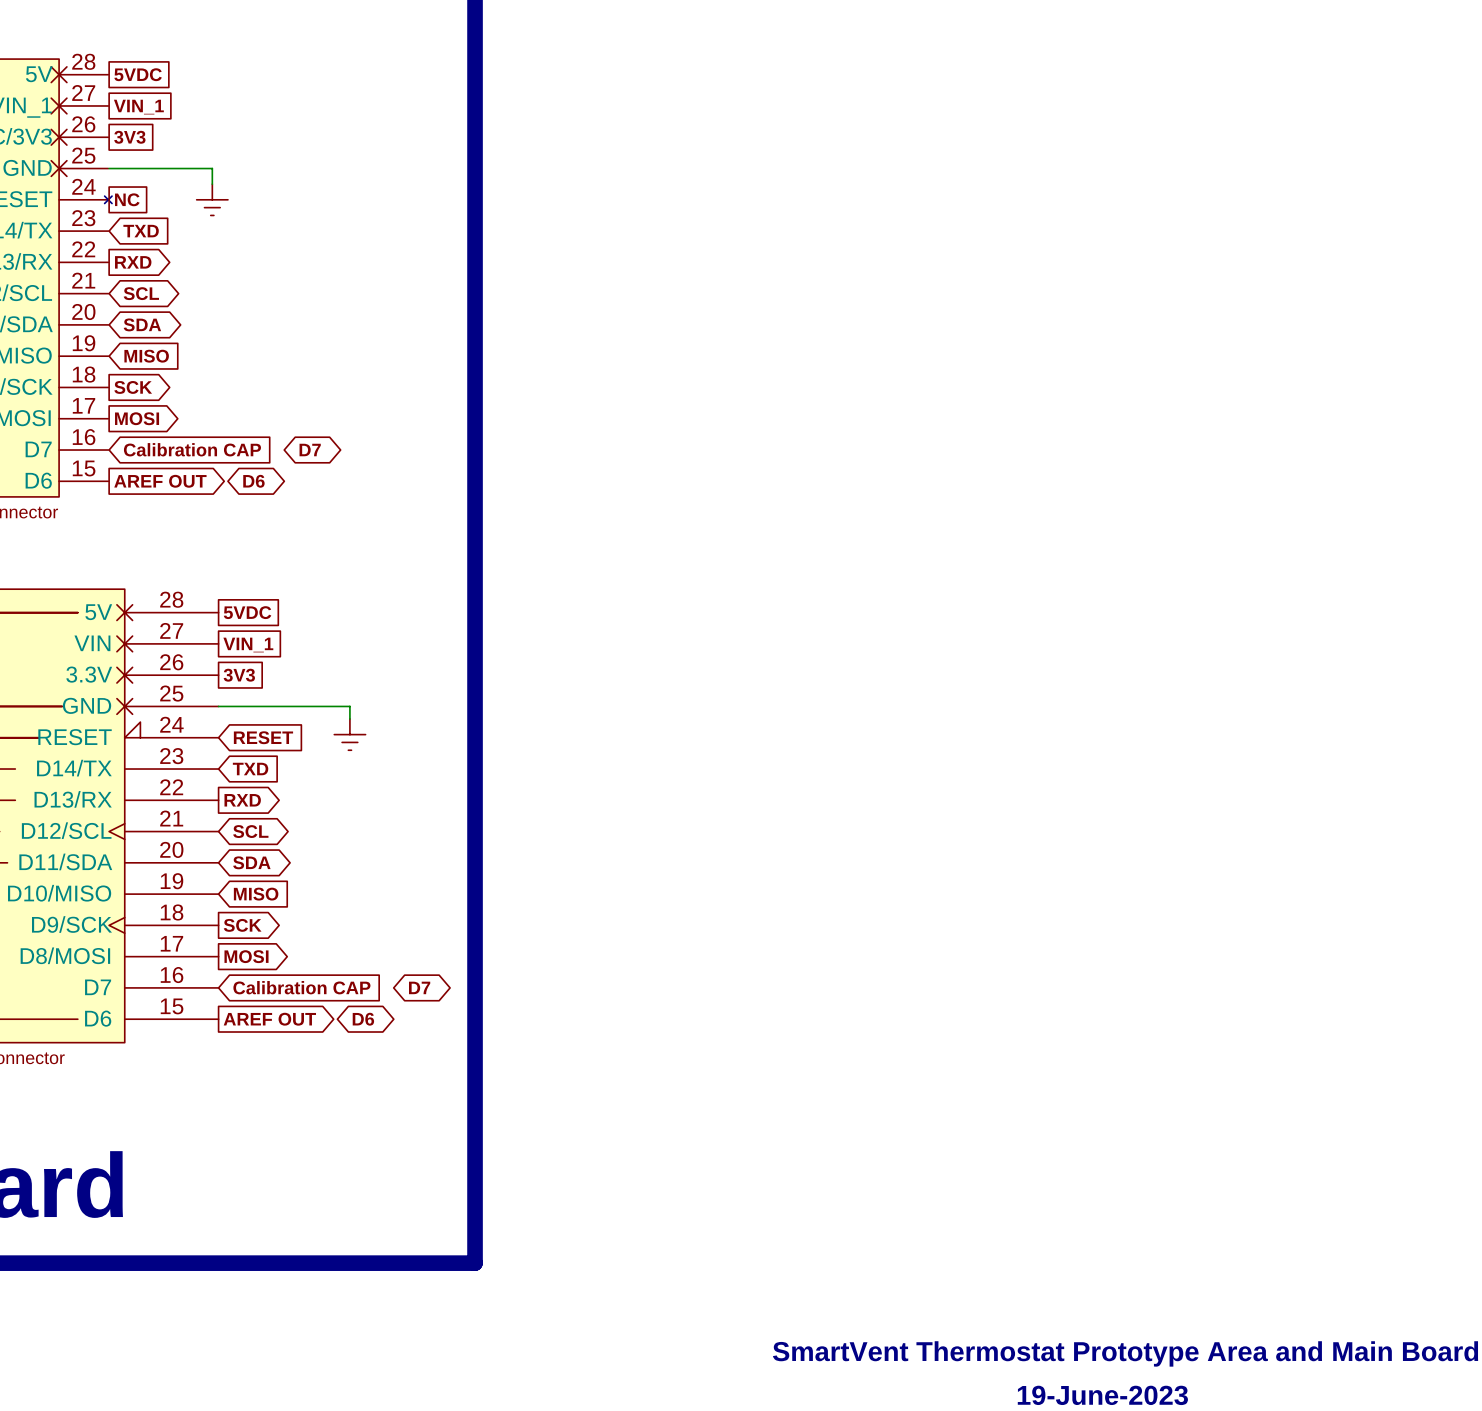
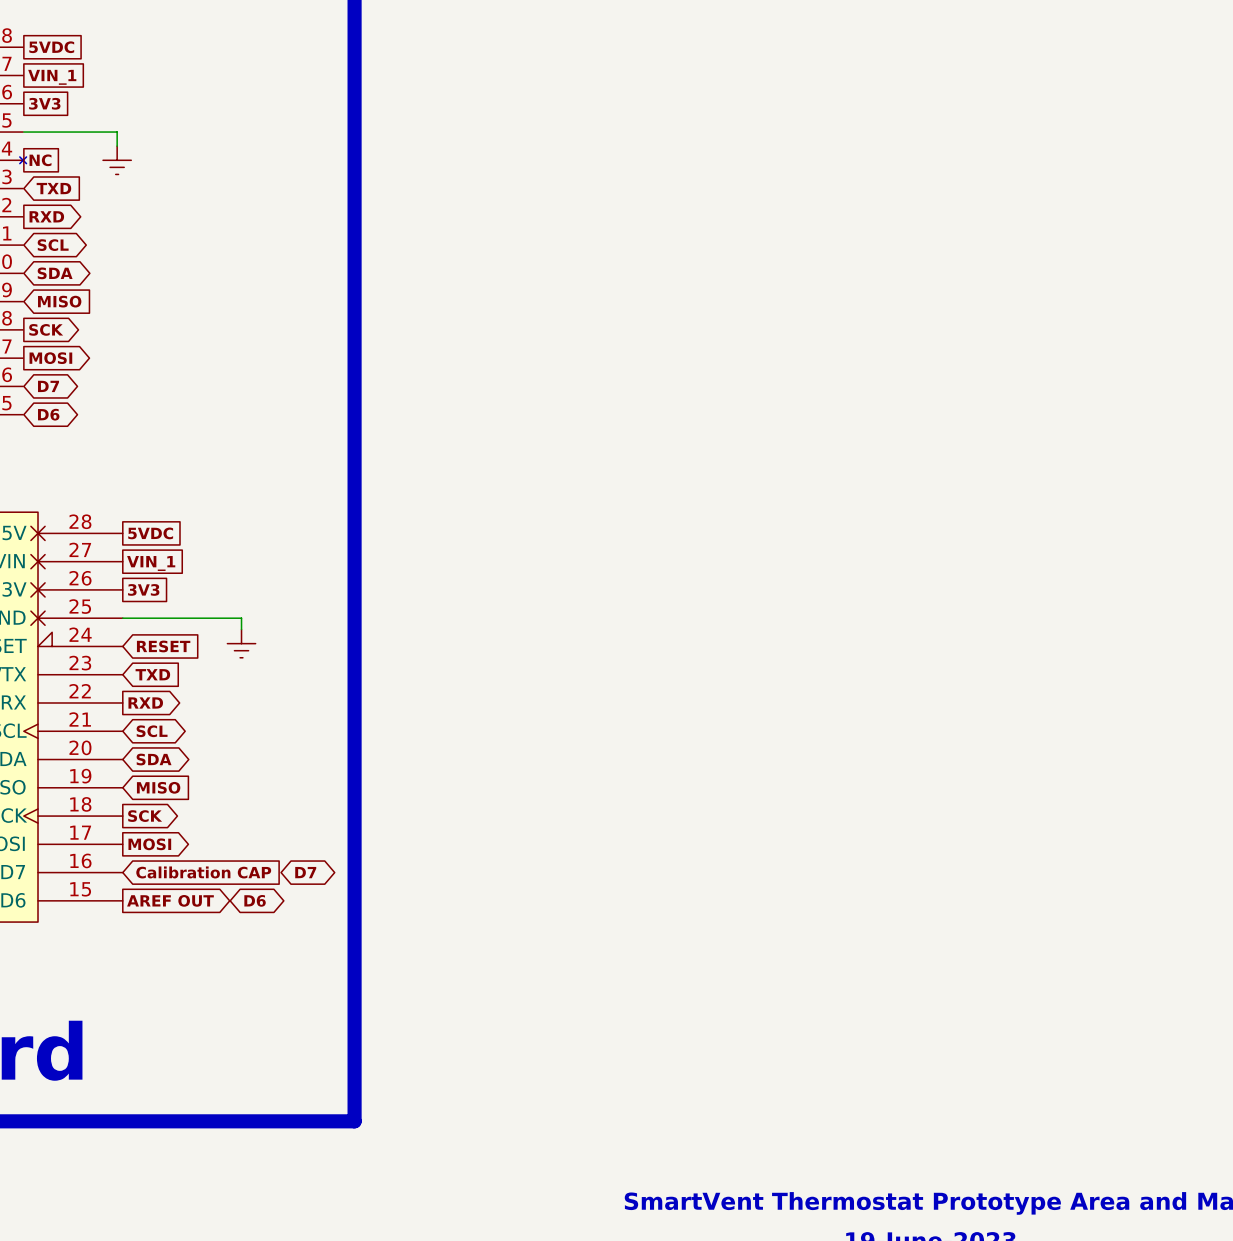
global label shape: input (192, 449) -> bidirectional (48, 386)
global label: Calibration CAP (192, 449) -> D7 (48, 386)
global label: D7 (310, 450) -> none
global label shape: output (160, 481) -> bidirectional (48, 414)
global label: AREF OUT (160, 481) -> D6 (48, 414)
global label: D6 (253, 481) -> none

